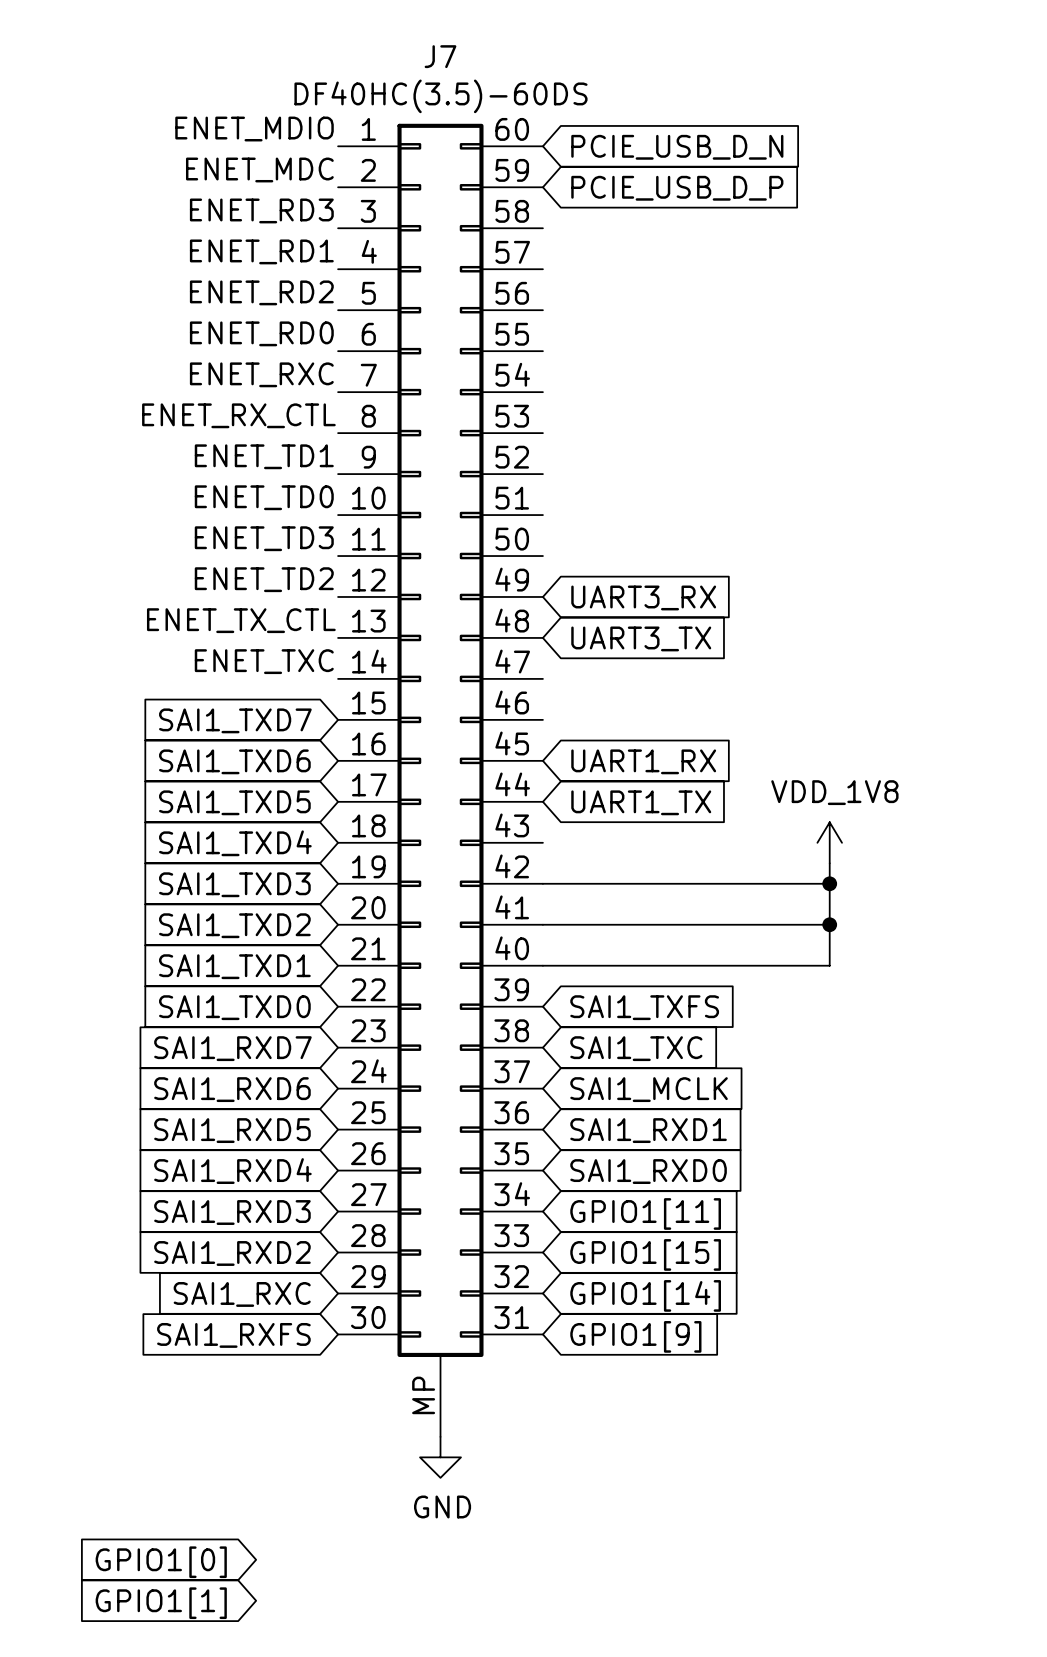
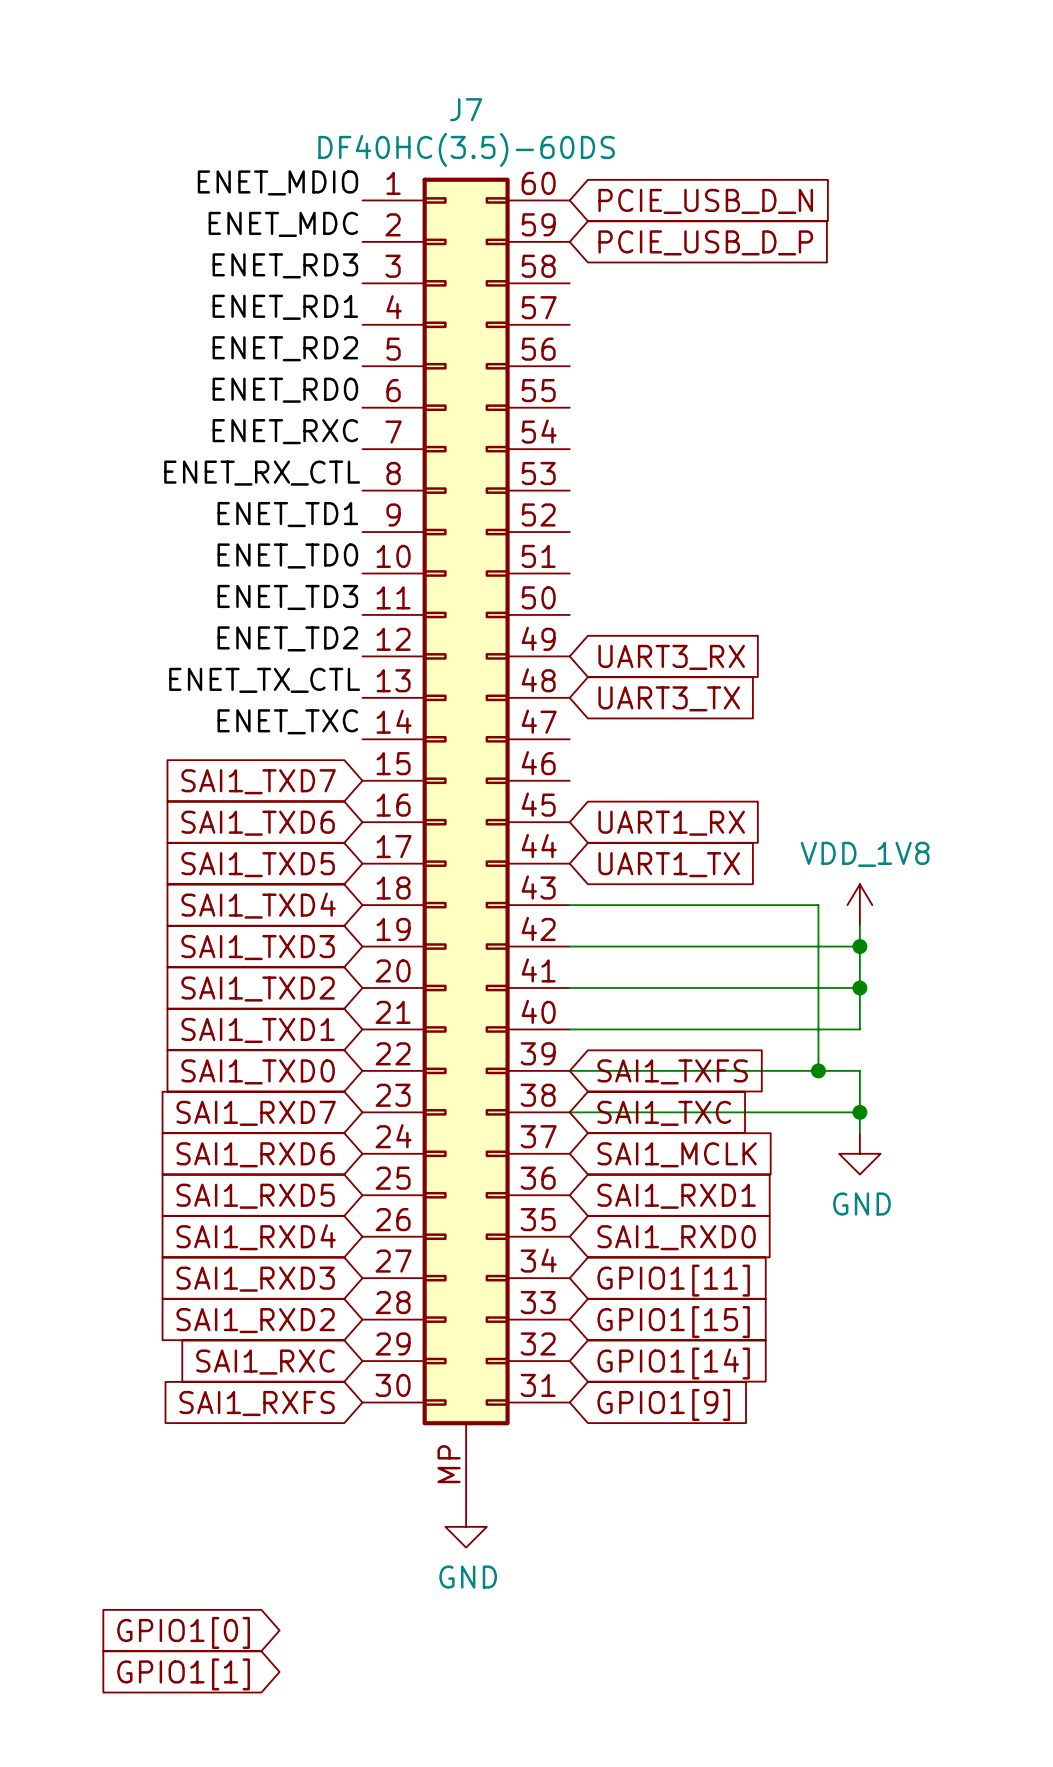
wire: none -> (569, 905) (818, 905) (818, 1070)
wire: none -> (569, 1070) (859, 1070) (859, 1133)
junction: none -> (818, 1070)
wire: none -> (569, 1112) (859, 1112)
junction: none -> (859, 1112)
power symbol: none -> GND (859, 1153)

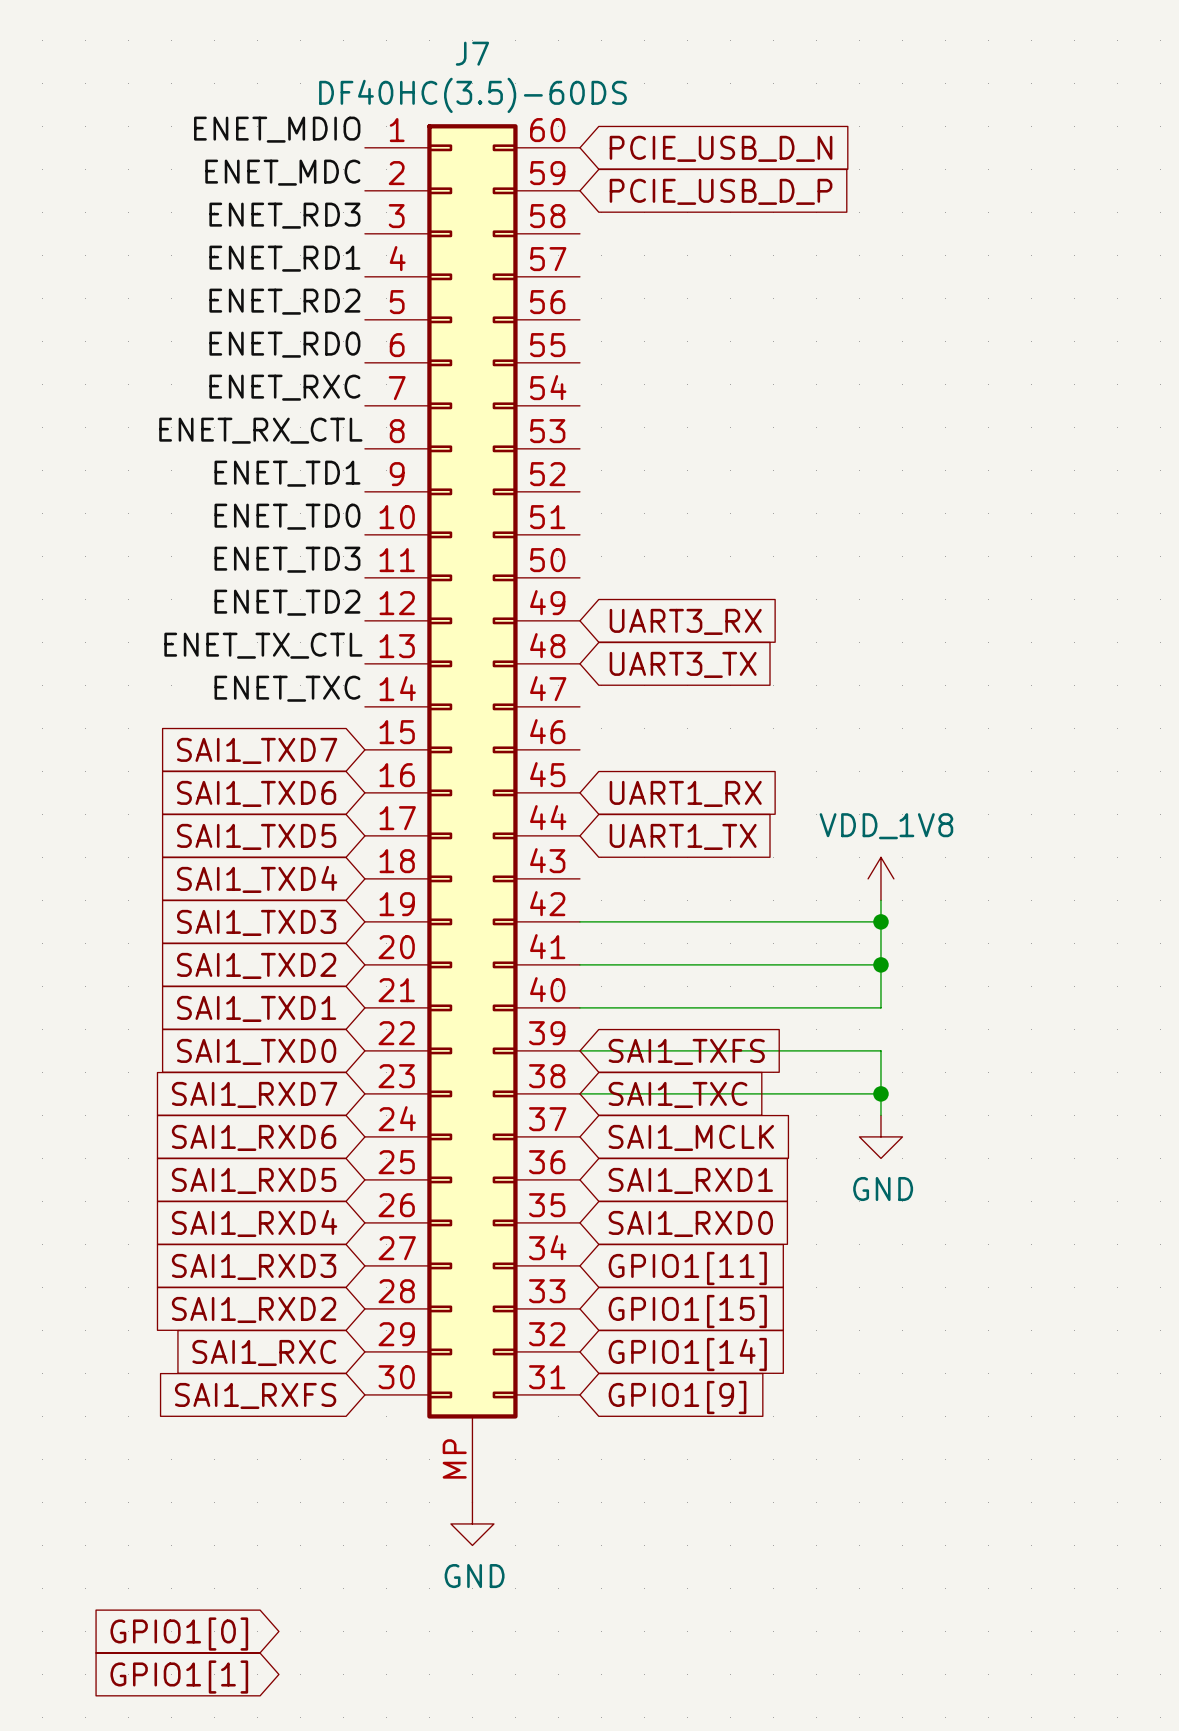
wire: (569, 905) (818, 905) (818, 1070) -> none
junction: (818, 1070) -> none

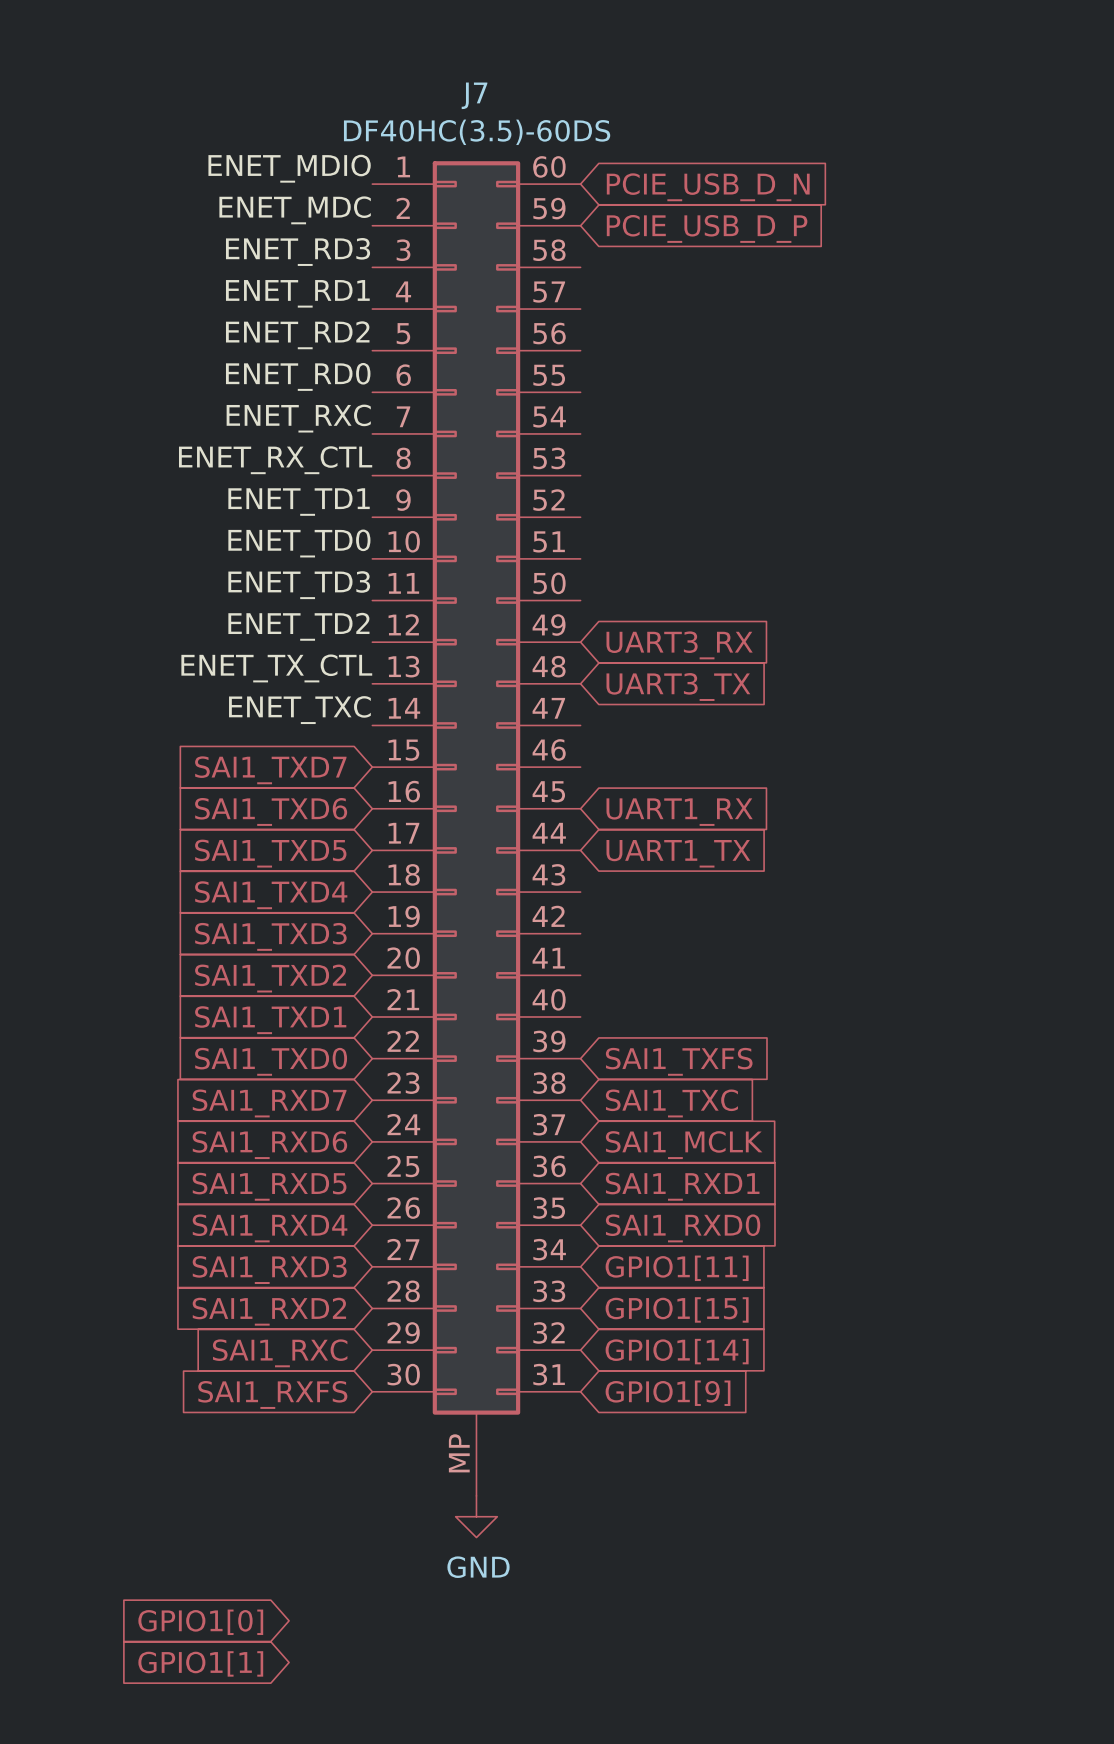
power symbol: VDD_1V8 (880, 878) -> none
wire: (880, 900) (880, 1007) (579, 1007) -> none
wire: (579, 921) (880, 921) -> none
junction: (880, 921) -> none
wire: (579, 964) (880, 964) -> none
junction: (880, 964) -> none
wire: (579, 1050) (880, 1050) (880, 1115) -> none
wire: (579, 1093) (880, 1093) -> none
junction: (880, 1093) -> none
power symbol: GND (880, 1136) -> none

